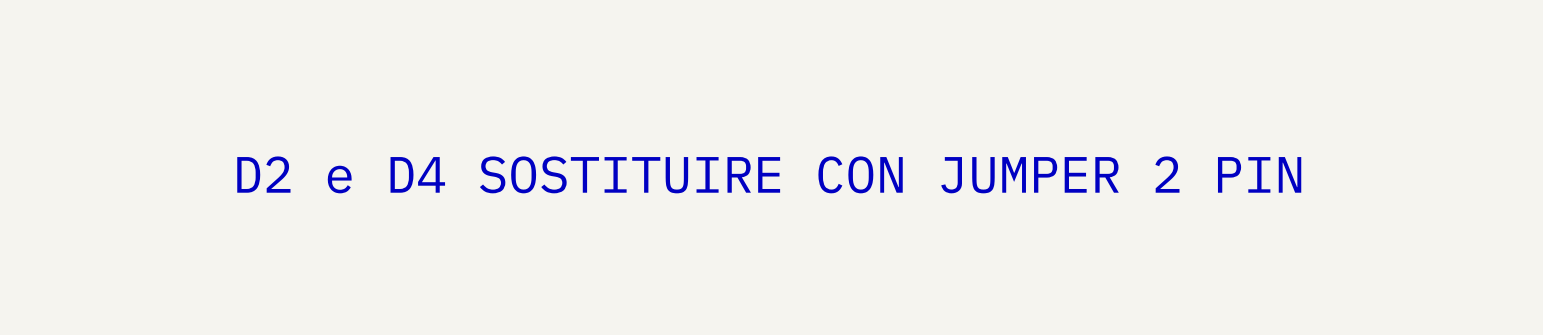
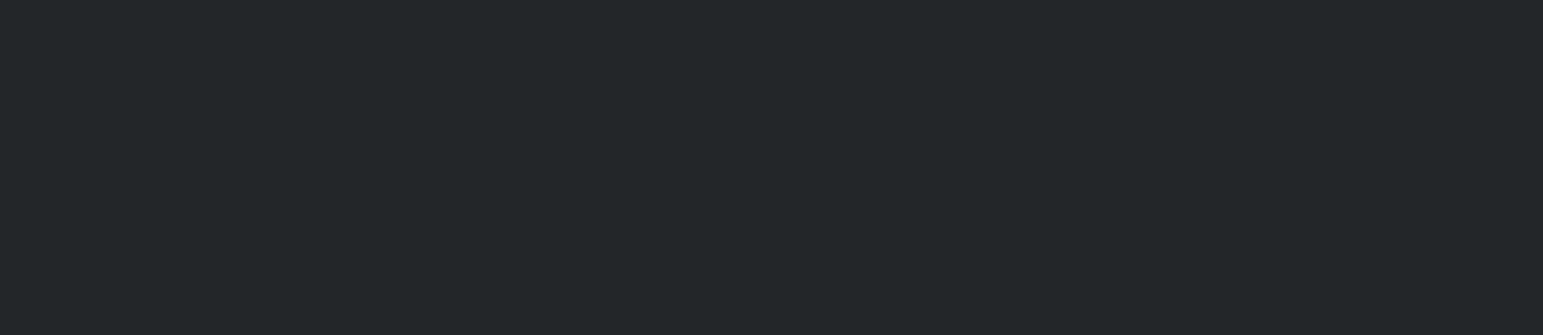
text: D2 e D4 SOSTITUIRE CON JUMPER 2 PIN (769, 174) -> none

